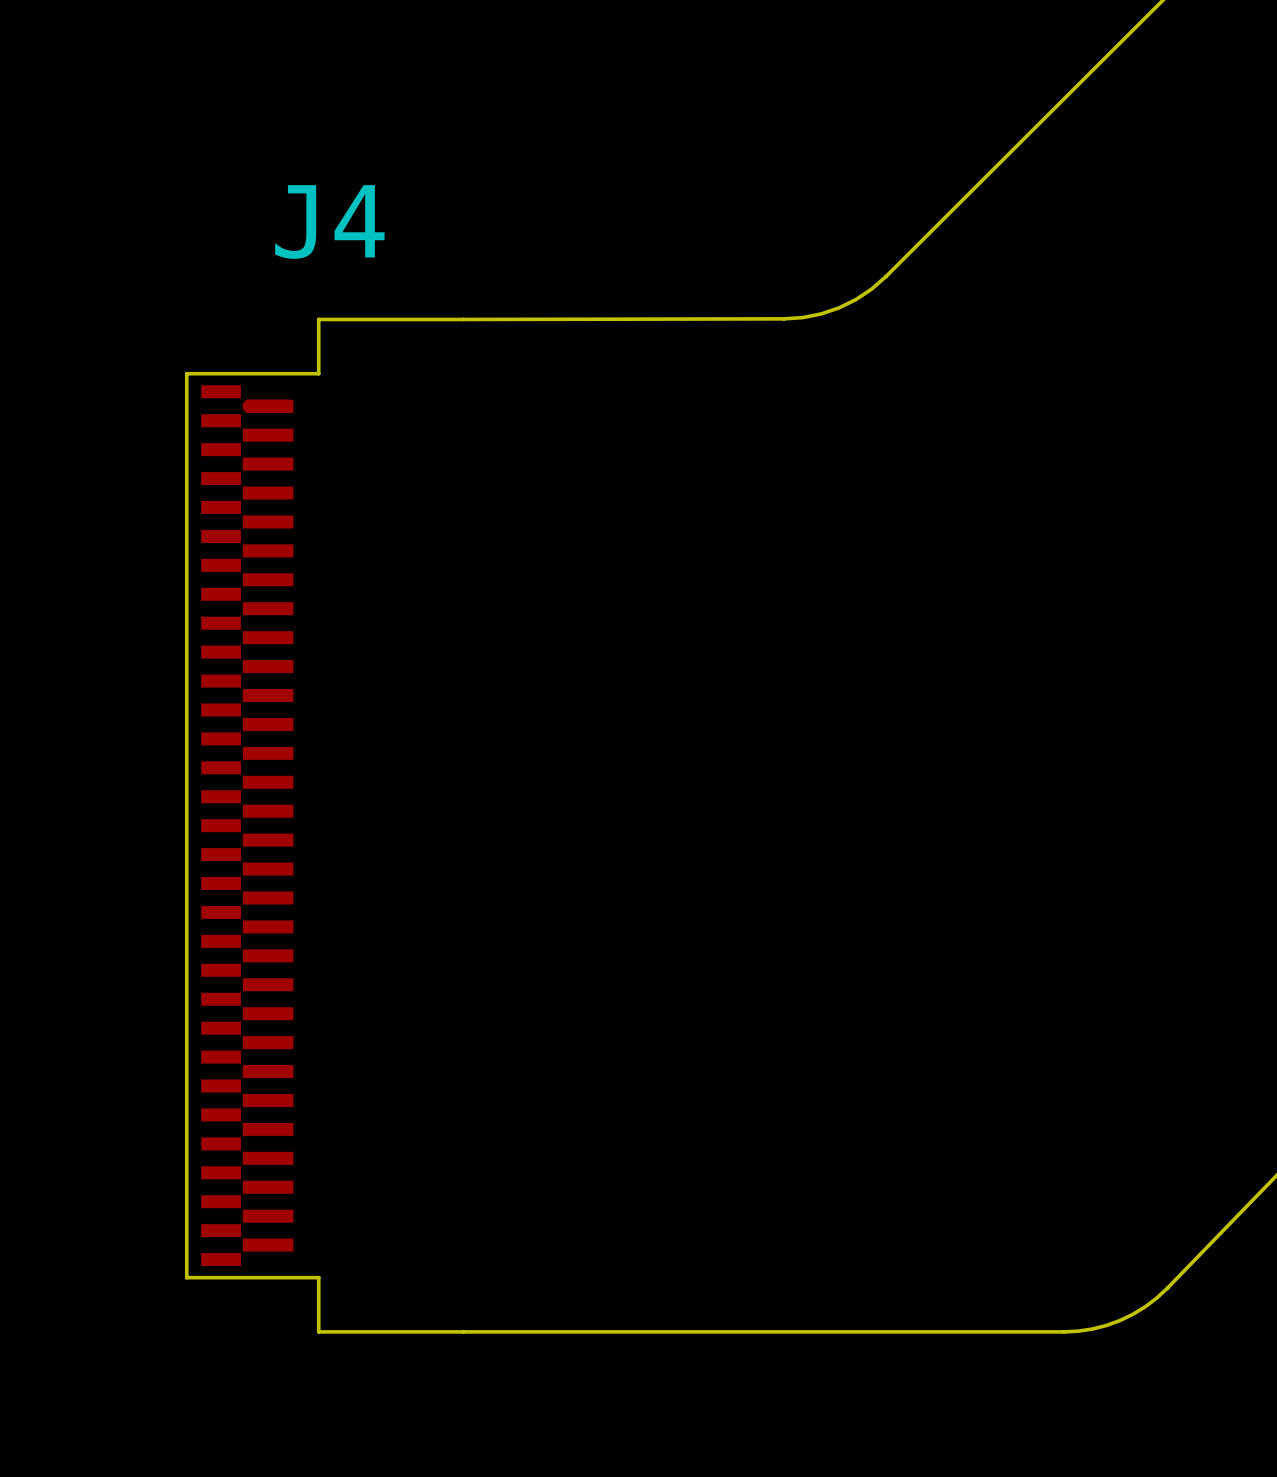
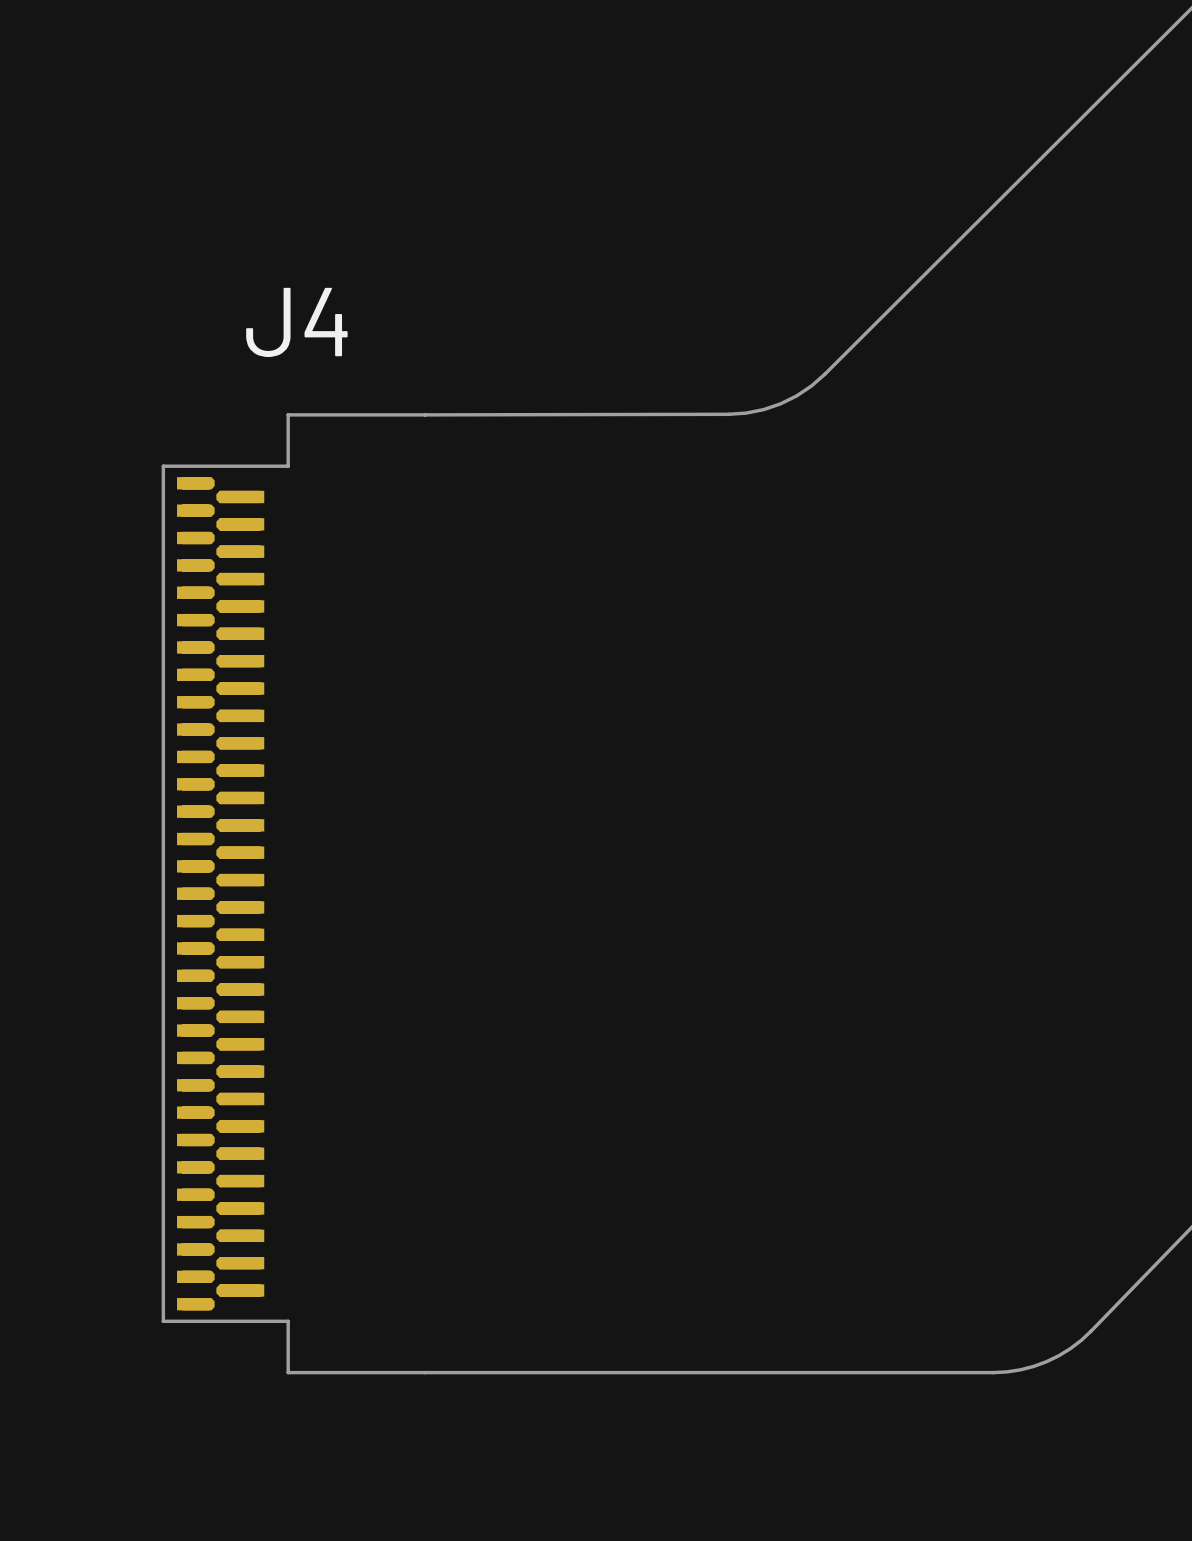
J4 footprint: [184, 317, 466, 1334] -> [161, 413, 427, 1375]

